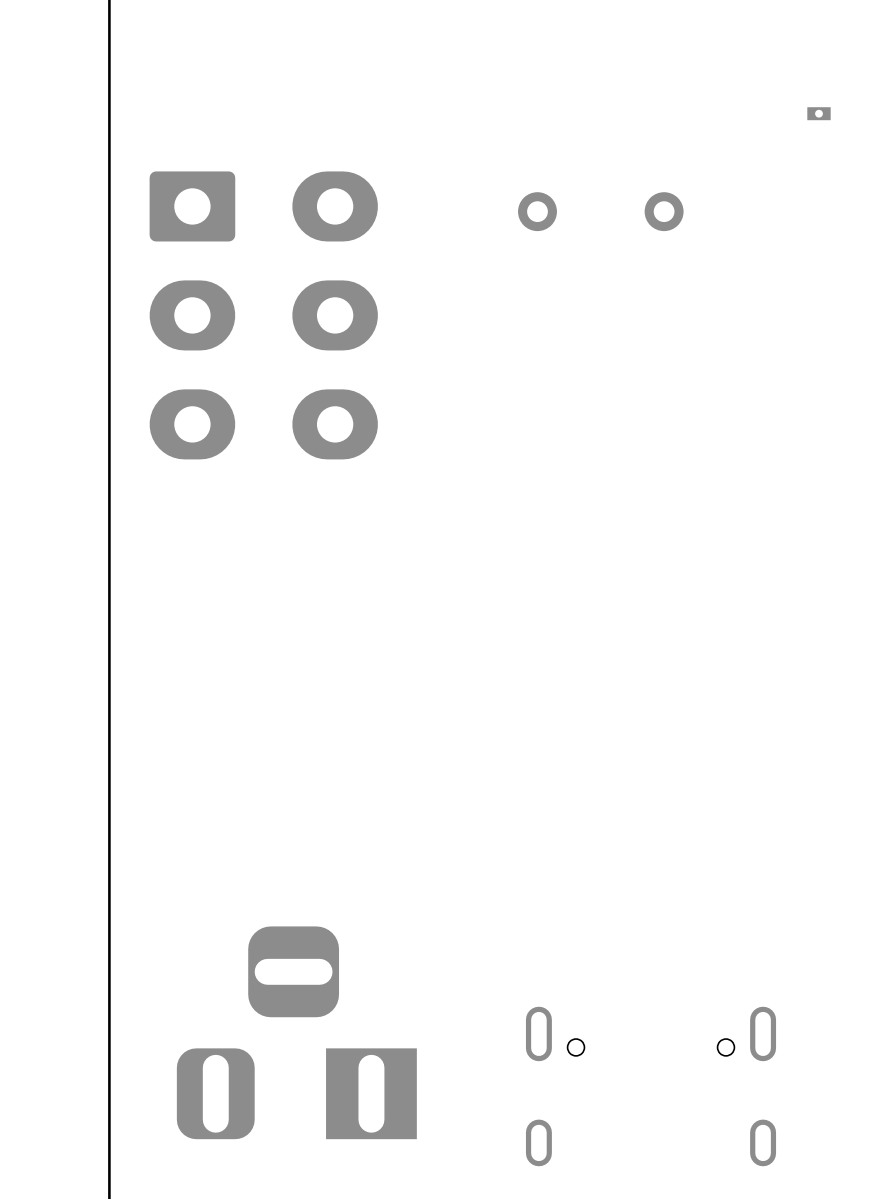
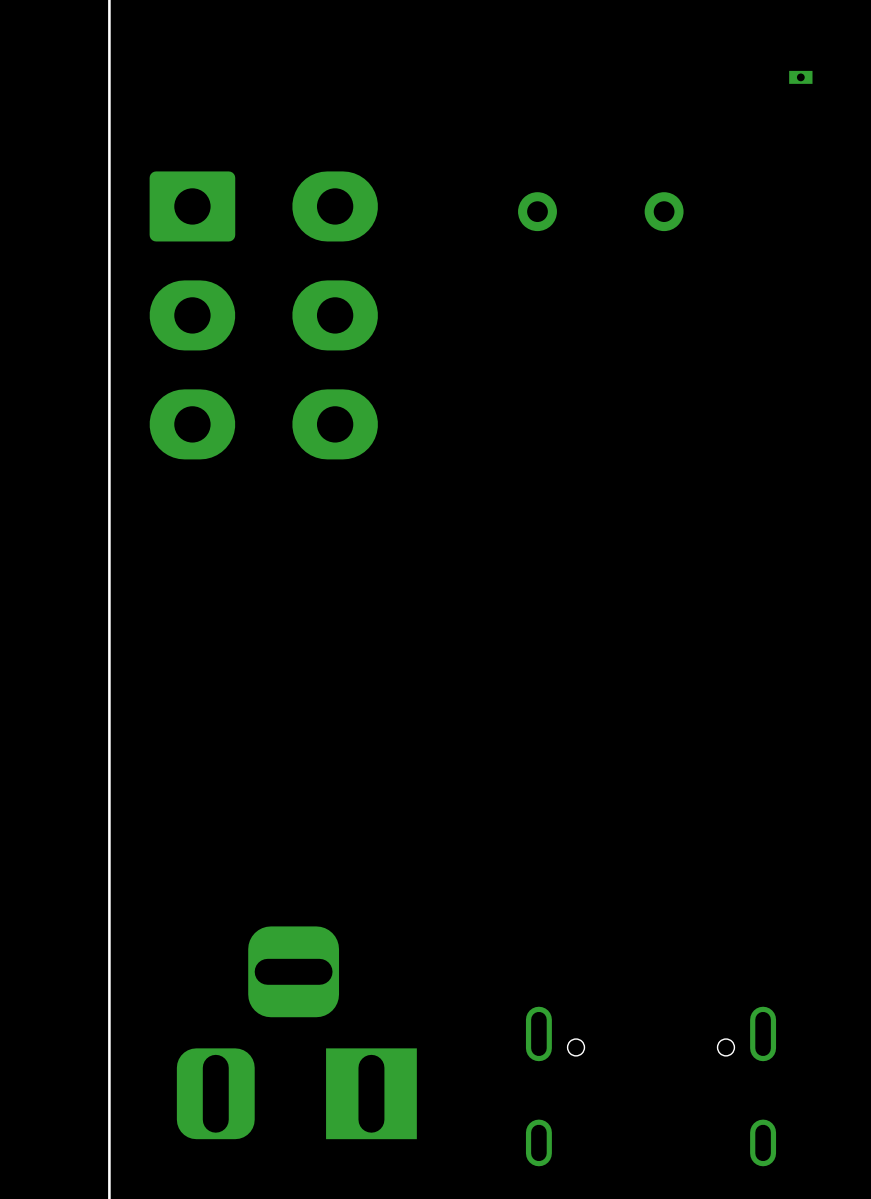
part position: (818, 113) -> (800, 77)

